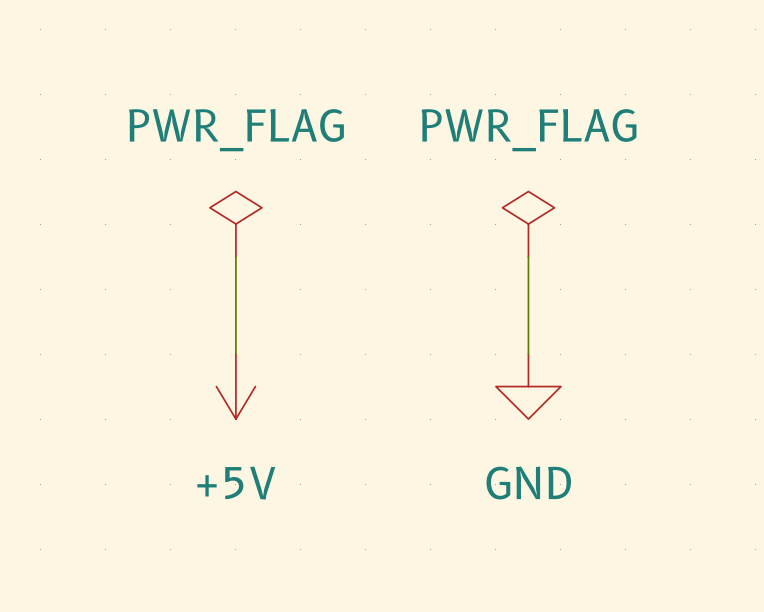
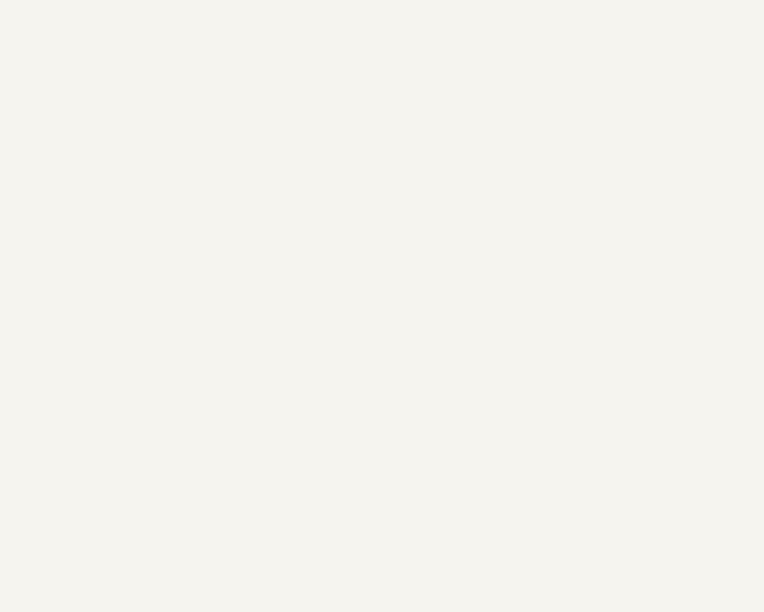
power symbol: PWR_FLAG (235, 224) -> none
power symbol: PWR_FLAG (528, 224) -> none
wire: (235, 256) (235, 354) -> none
wire: (528, 256) (528, 354) -> none
power symbol: +5V (235, 386) -> none
power symbol: GND (528, 386) -> none

